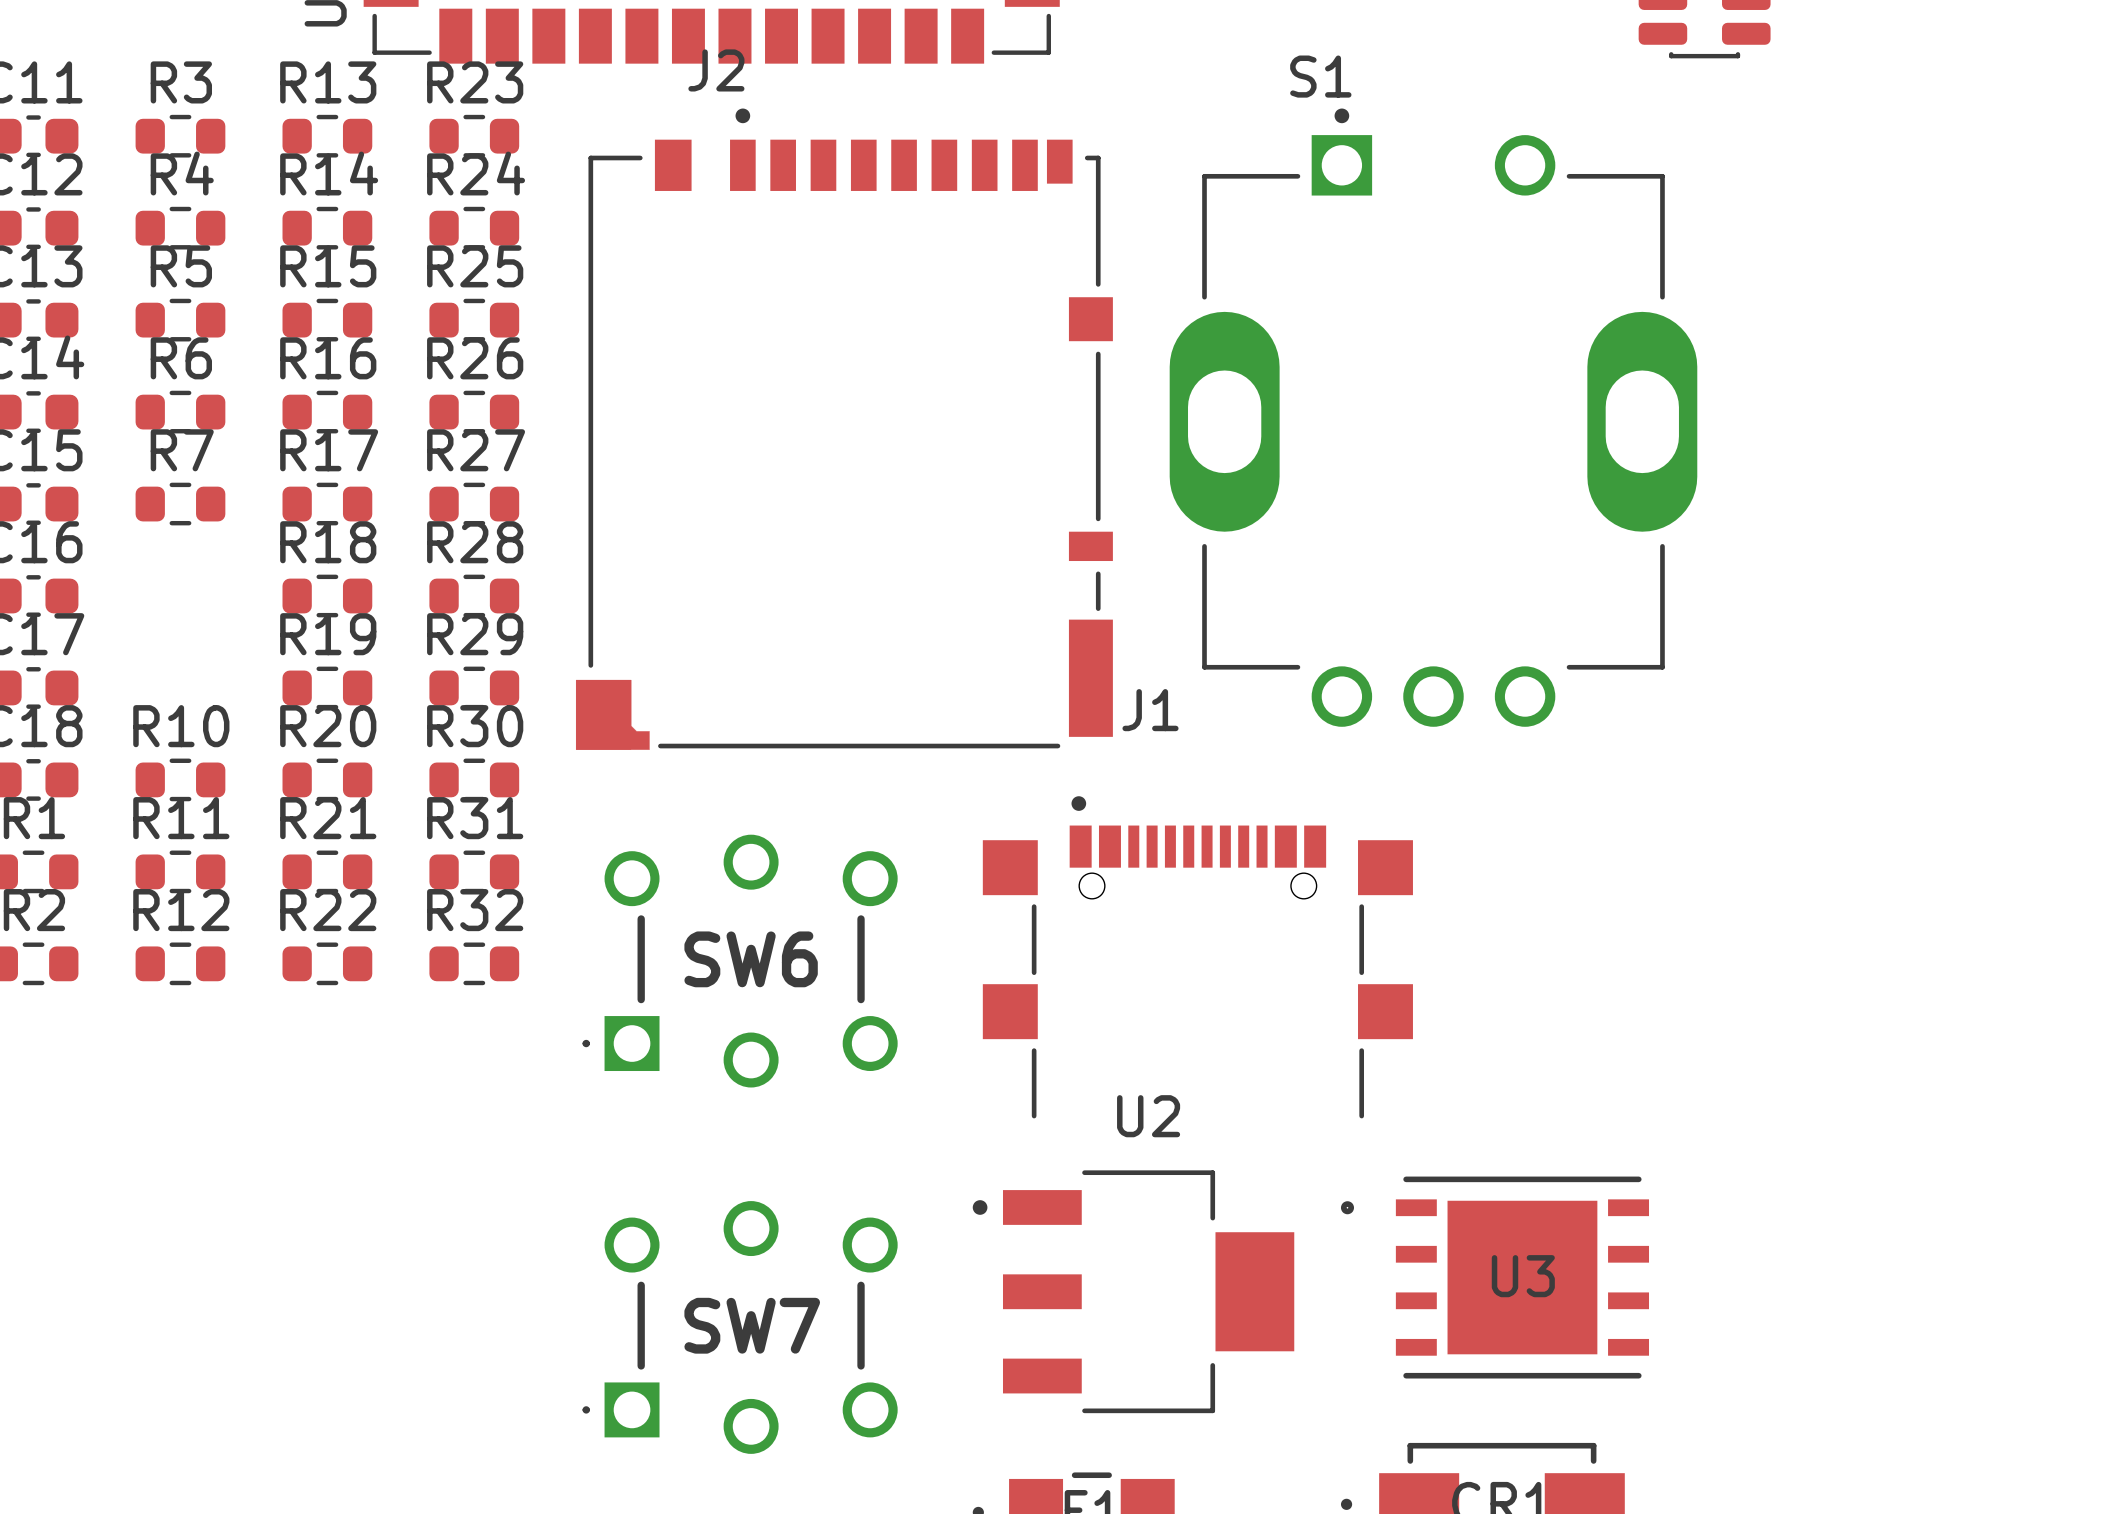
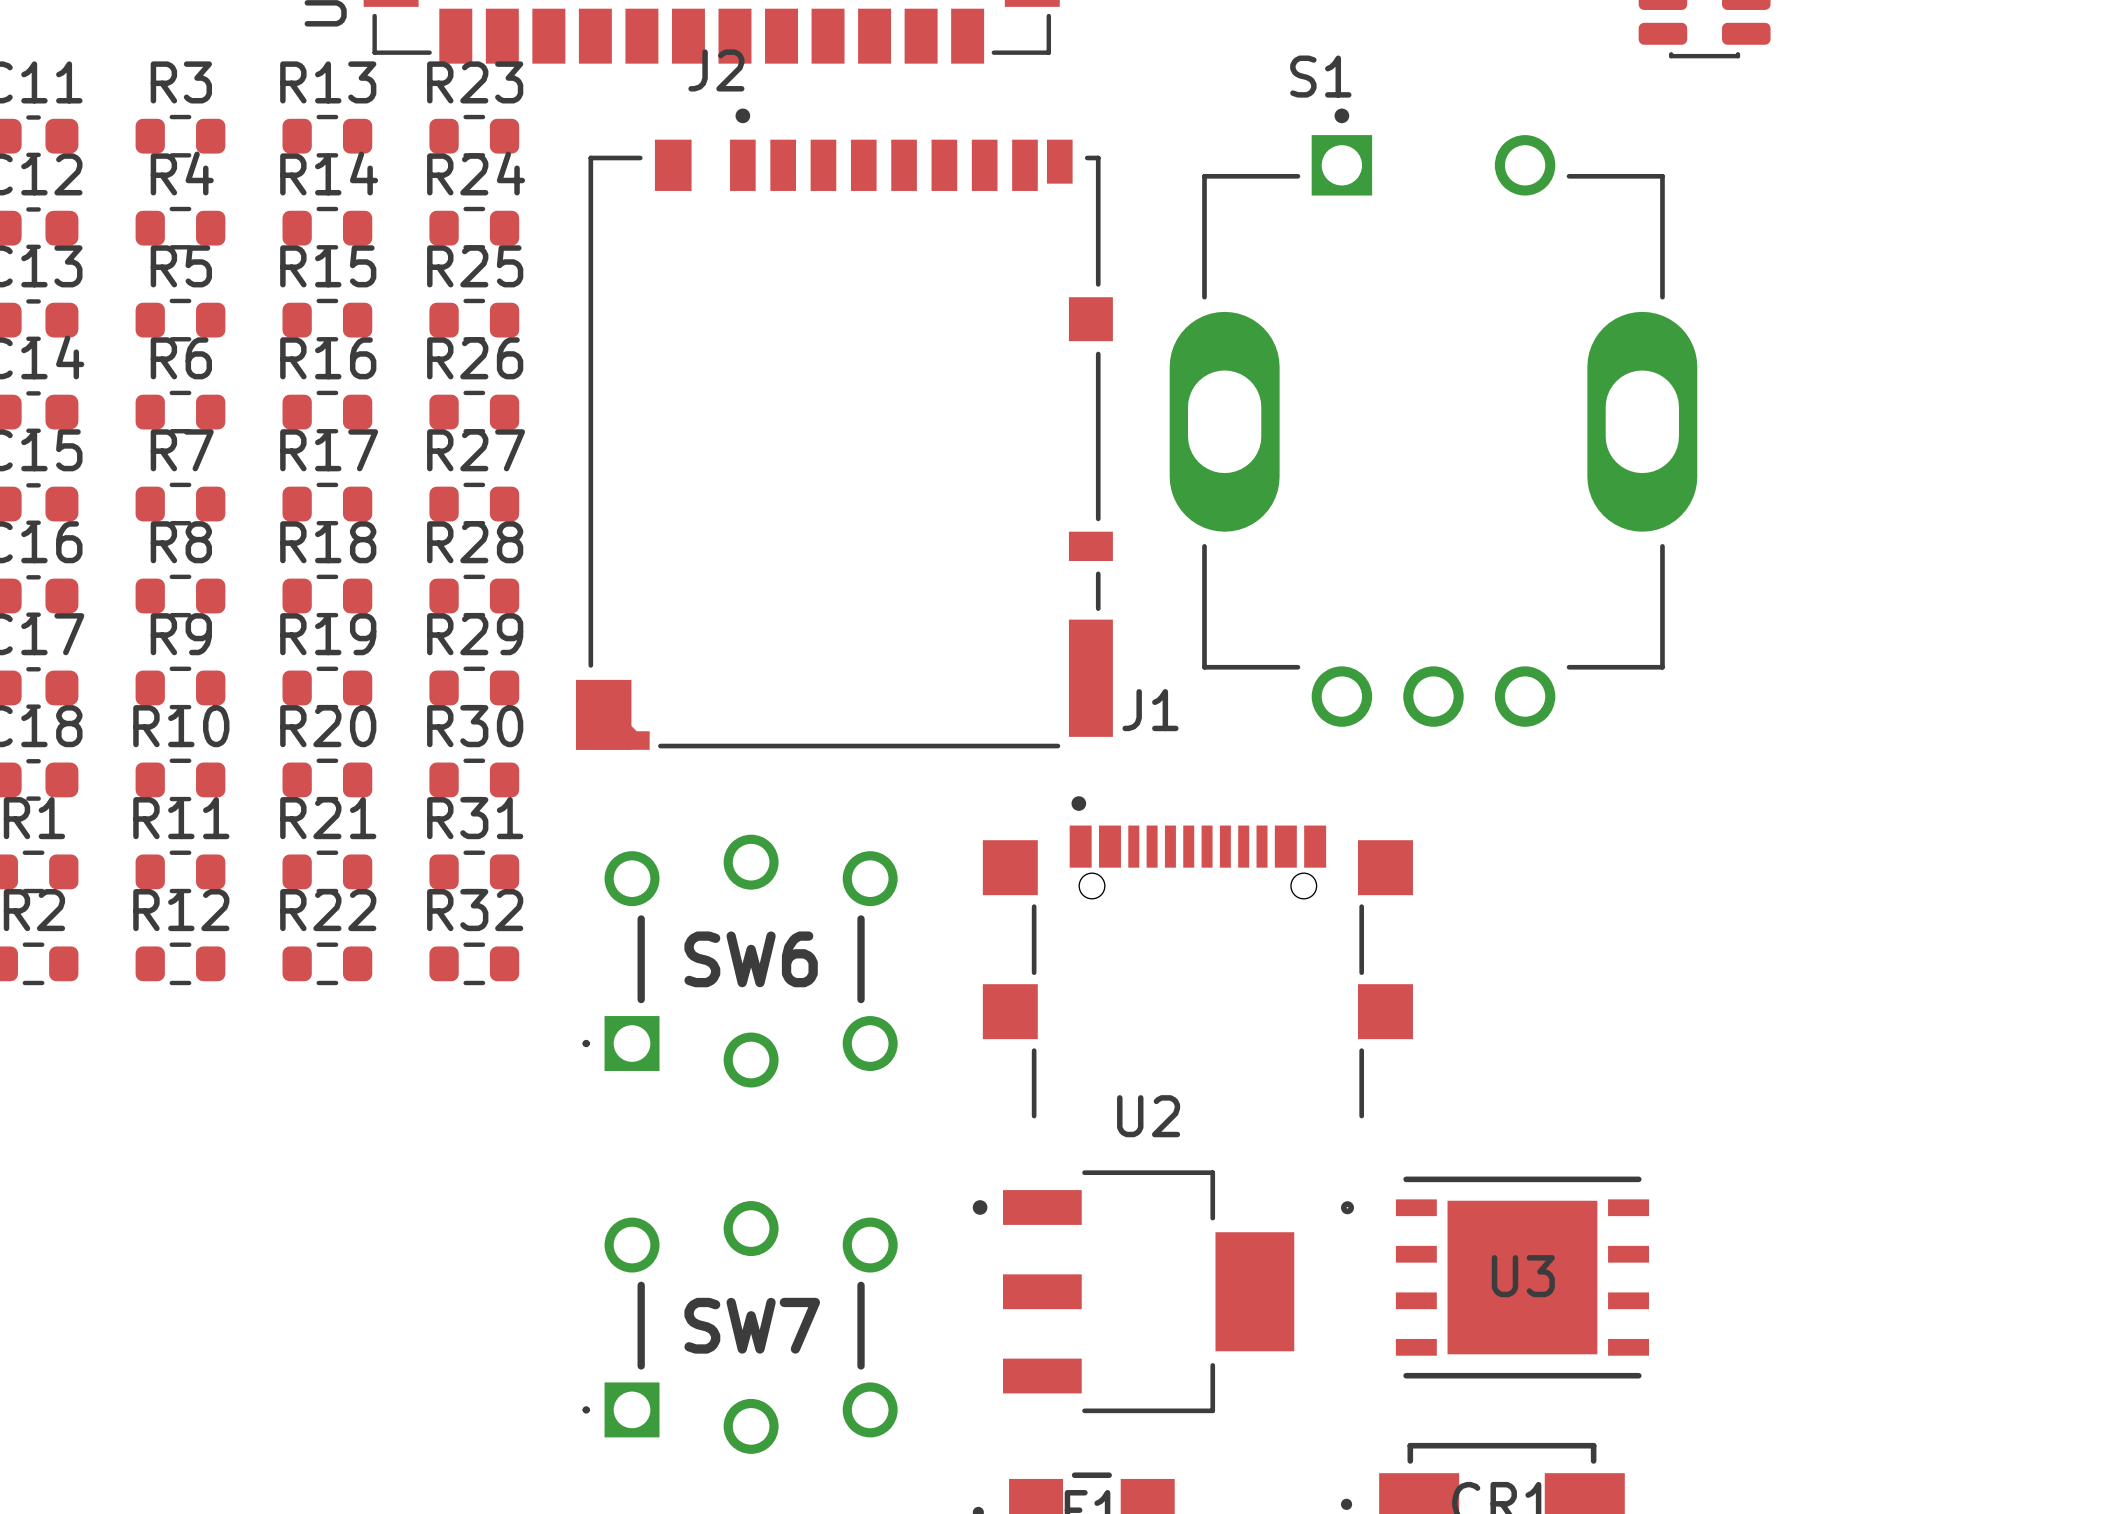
R8: none -> (180, 596)
R9: none -> (180, 687)

